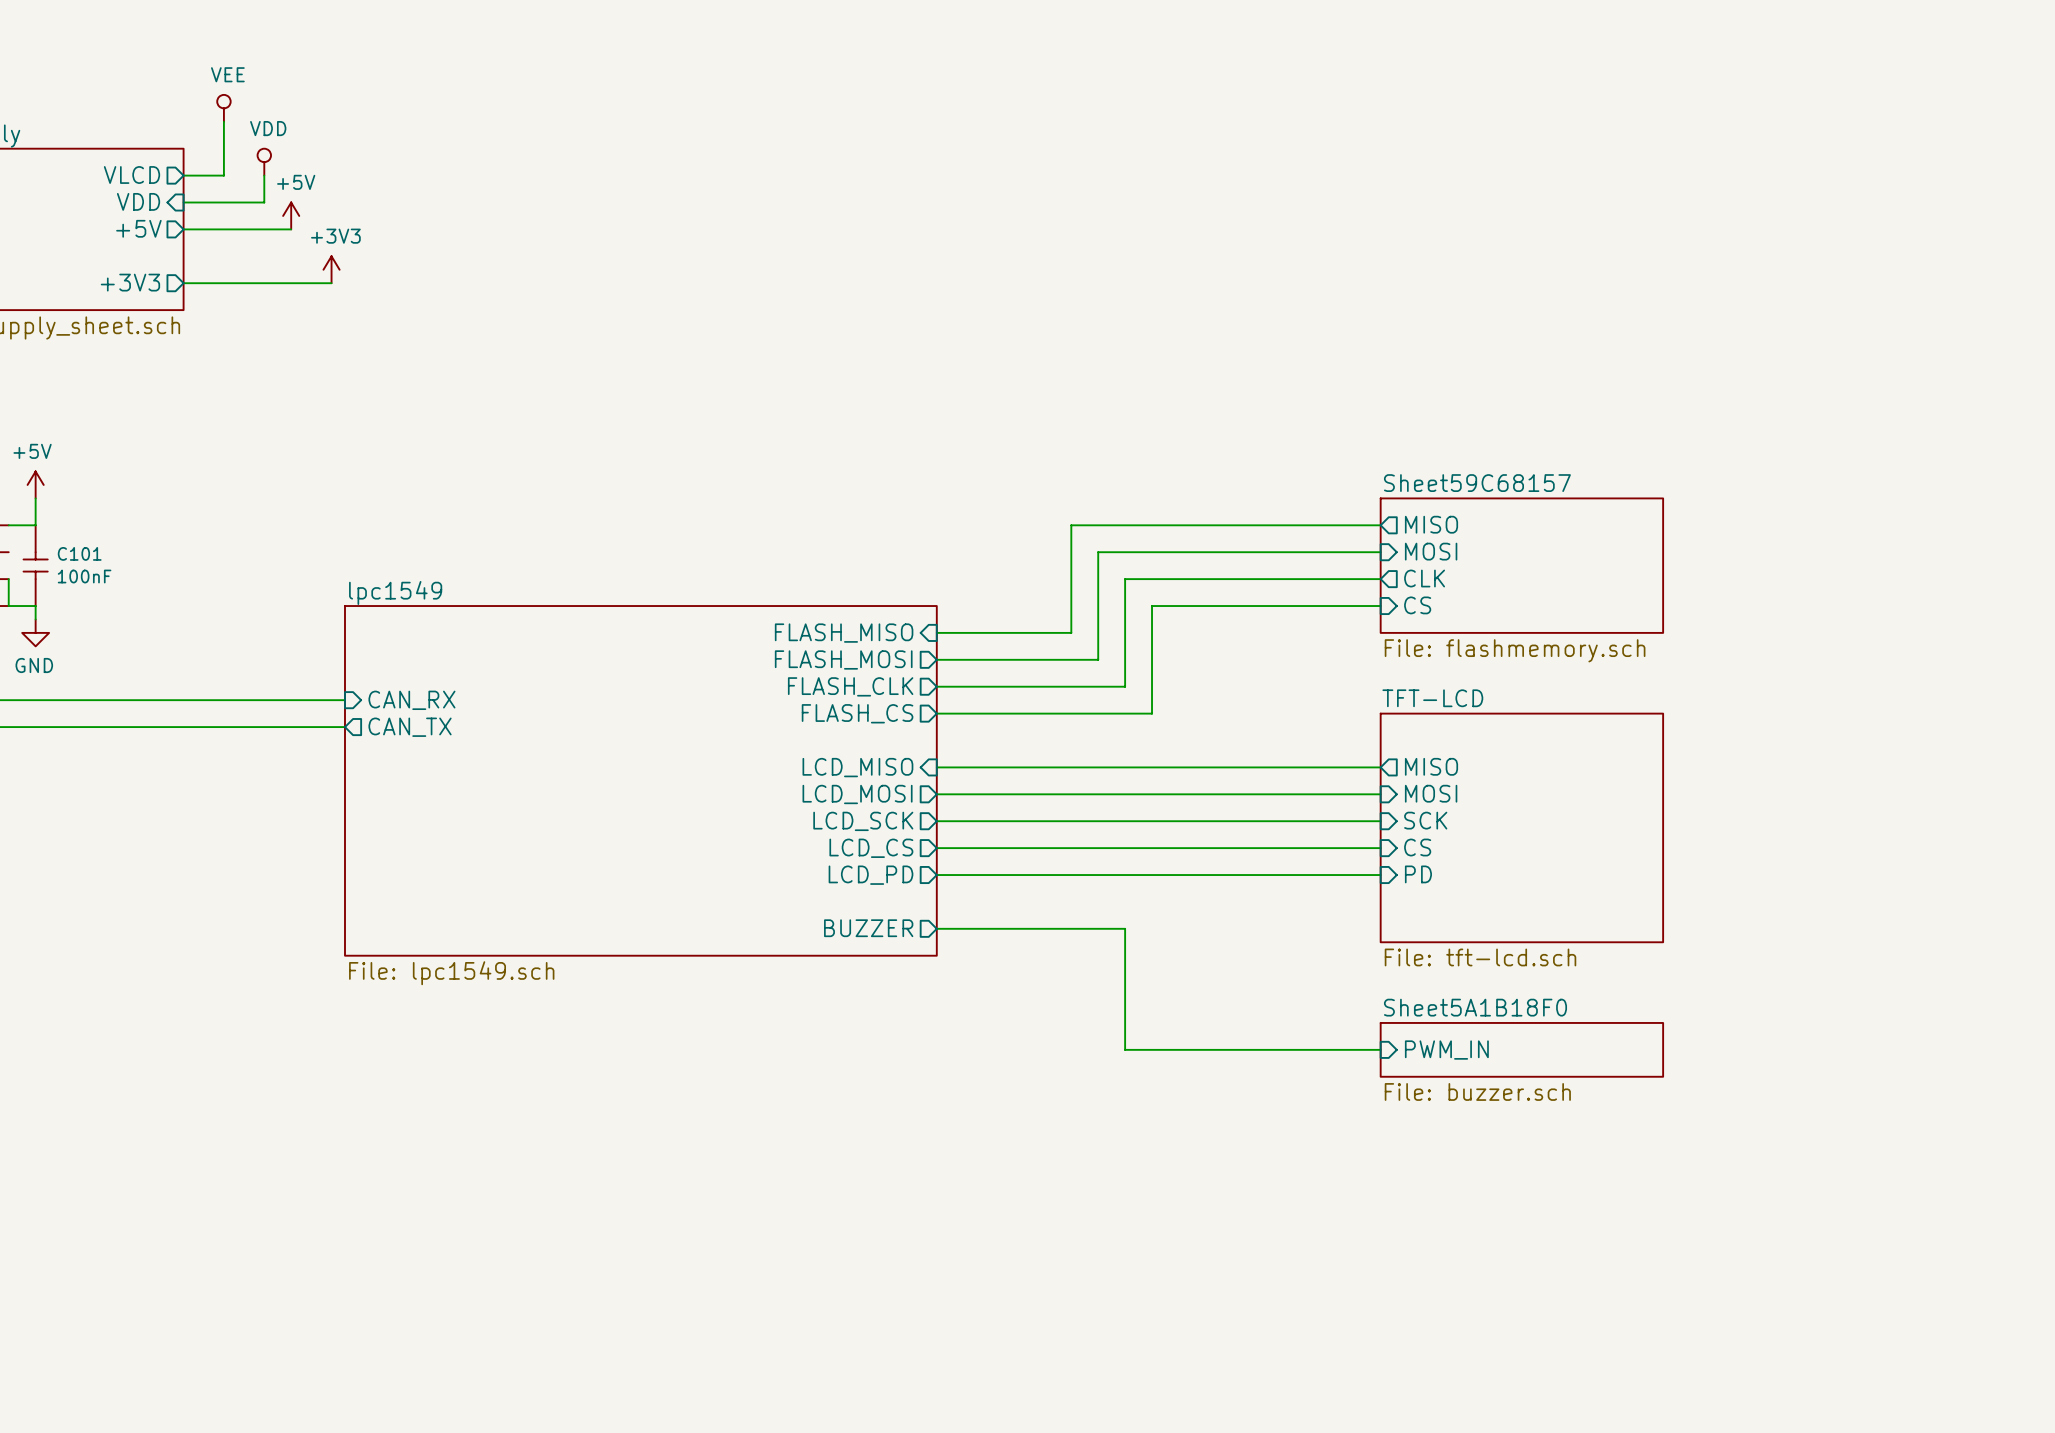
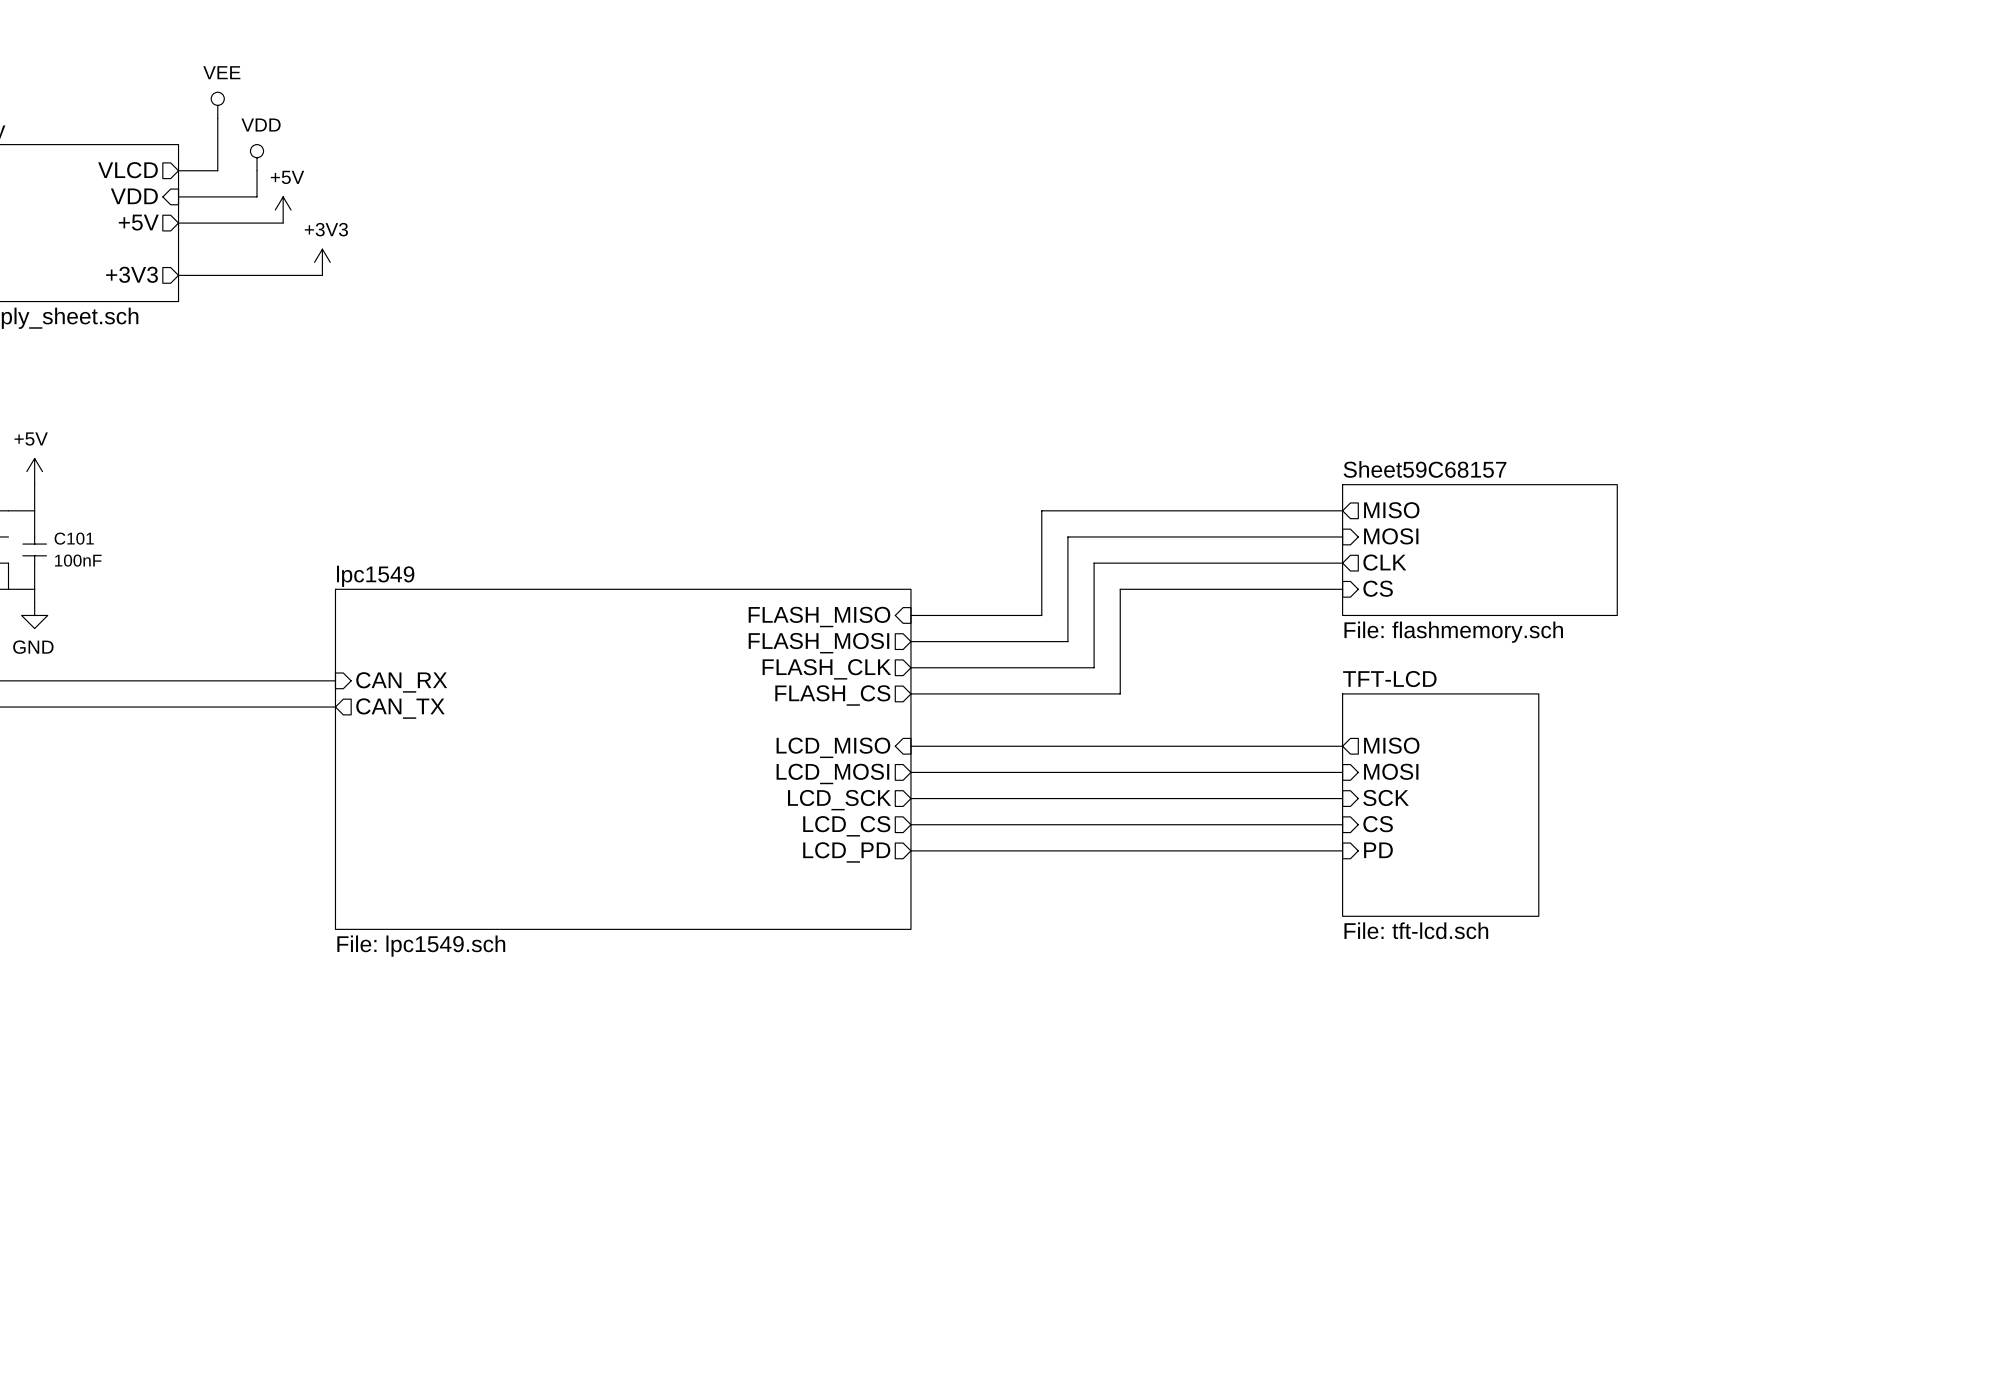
sheet TFT-LCD: none -> File: tft-lcd.sch (1440, 805)
sheet TFT-LCD: File: tft-lcd.sch (1521, 827) -> none
sheet pin: BUZZER (868, 928) -> none
wire: (936, 928) (1125, 928) (1125, 1049) (1380, 1049) -> none
sheet Sheet5A1B18F0: File: buzzer.sch (1521, 1049) -> none
sheet pin: PWM_IN (1446, 1050) -> none

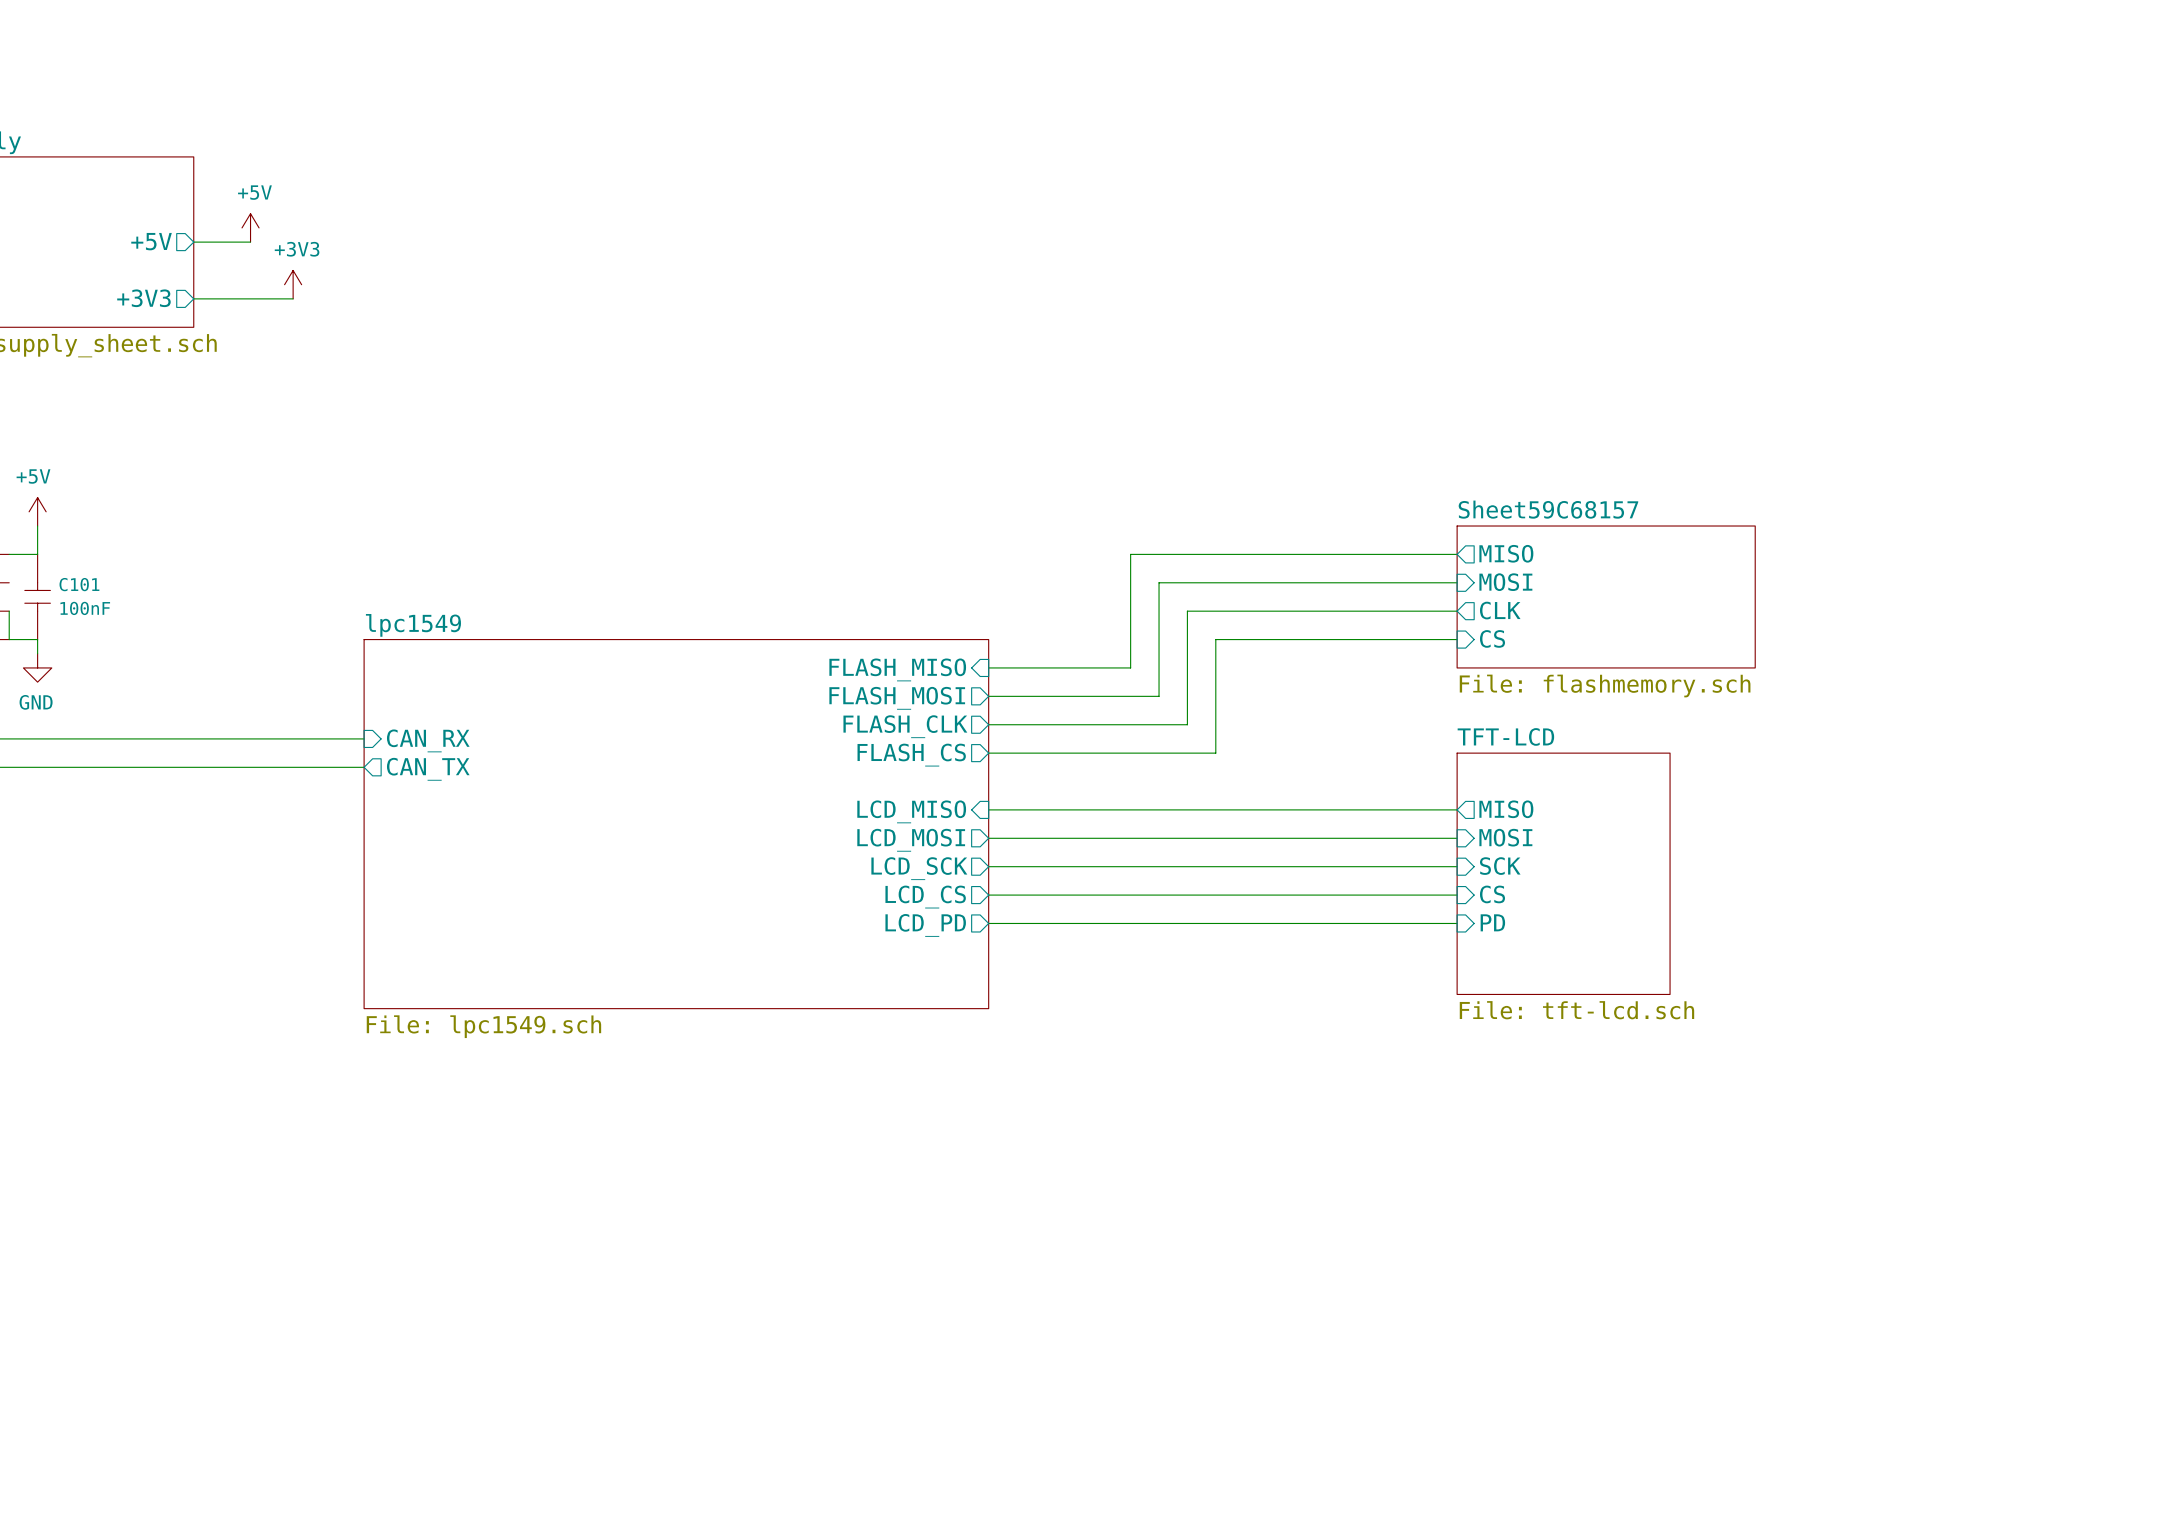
power symbol: VEE (217, 105) -> none
wire: (217, 118) (217, 170) (178, 170) -> none
power symbol: VDD (257, 157) -> none
sheet pin: VLCD (127, 170) -> none
wire: (257, 170) (257, 196) (178, 196) -> none
sheet pin: VDD (134, 196) -> none
power symbol position: +5V (283, 210) -> +5V (250, 227)
wire: (230, 223) (283, 223) -> none
power symbol position: +3V3 (322, 262) -> +3V3 (293, 284)
wire: (270, 275) (322, 275) -> none

